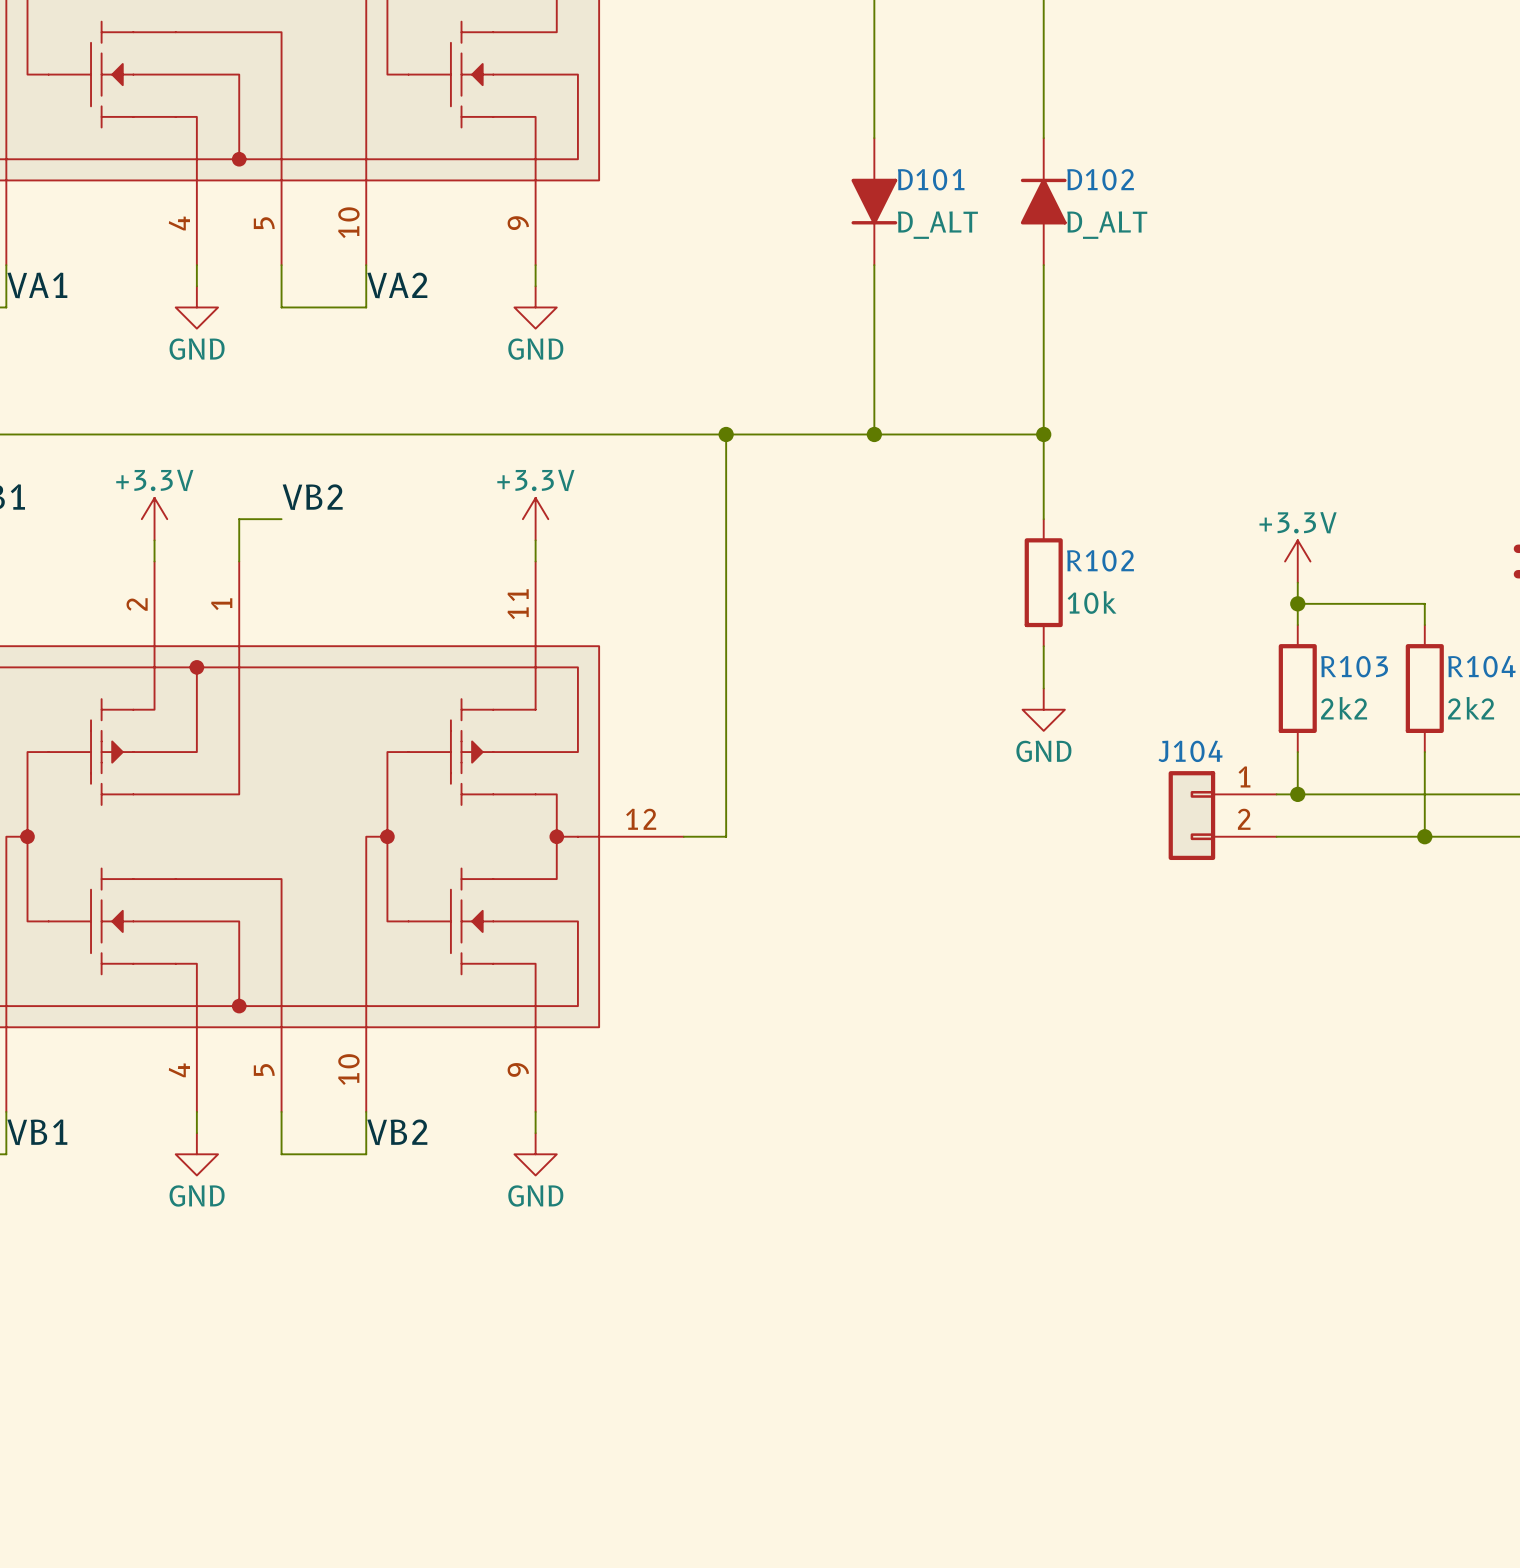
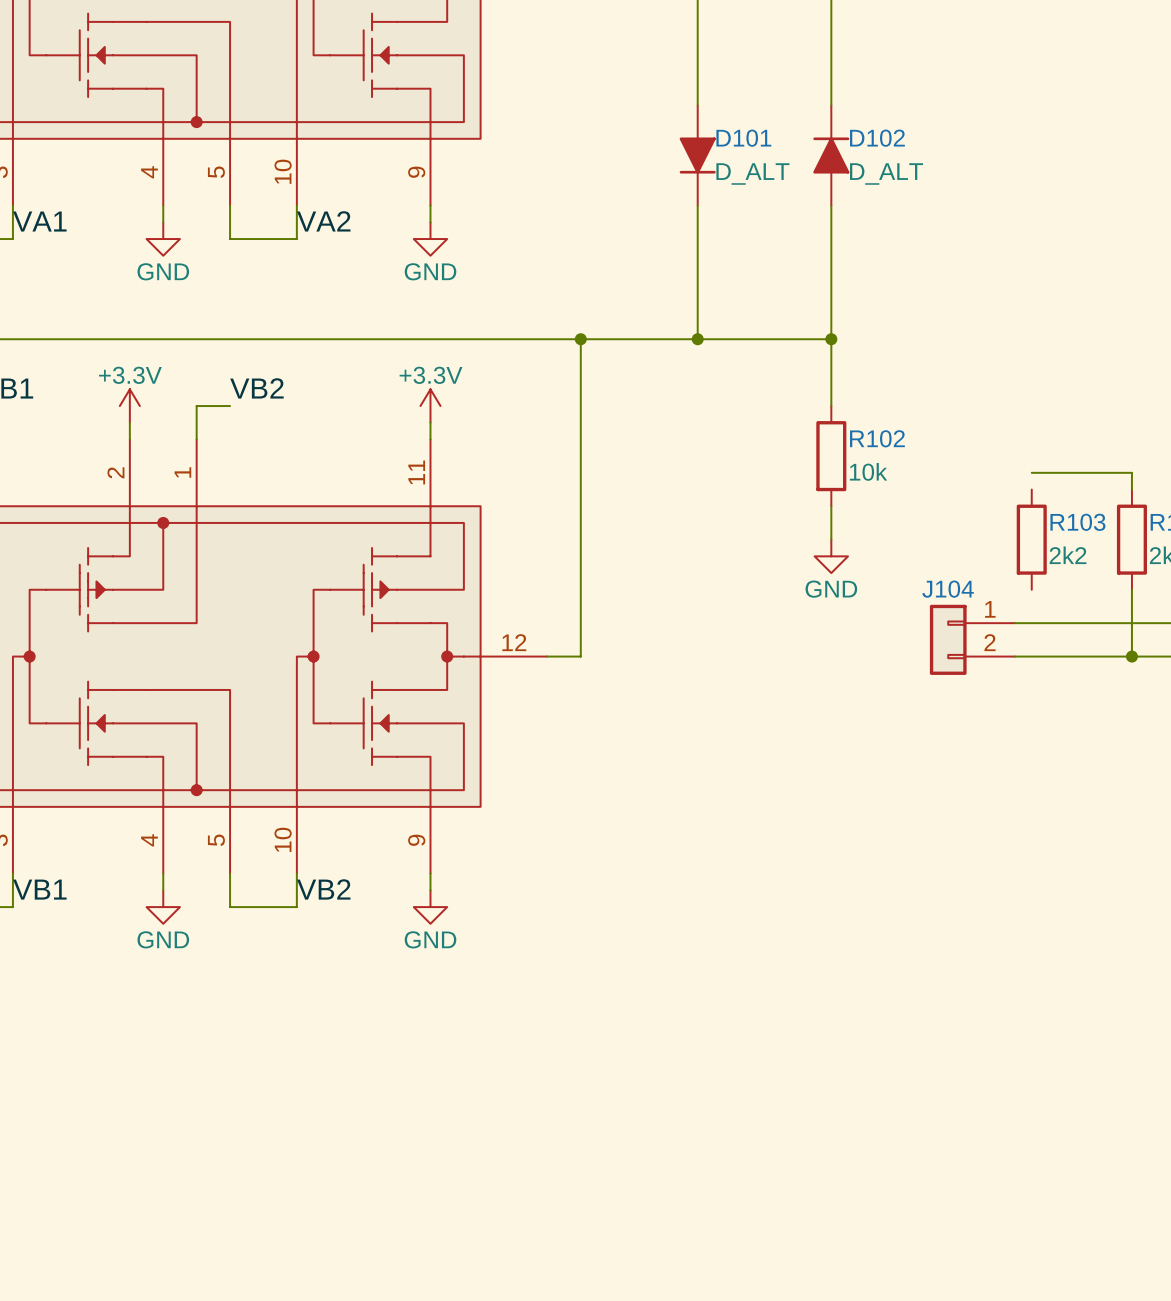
power symbol: +3.3V (1297, 561) -> none
wire: (1297, 582) (1297, 625) -> none
junction: (1297, 603) -> none
wire: (1297, 752) (1297, 794) -> none
junction: (1297, 794) -> none

